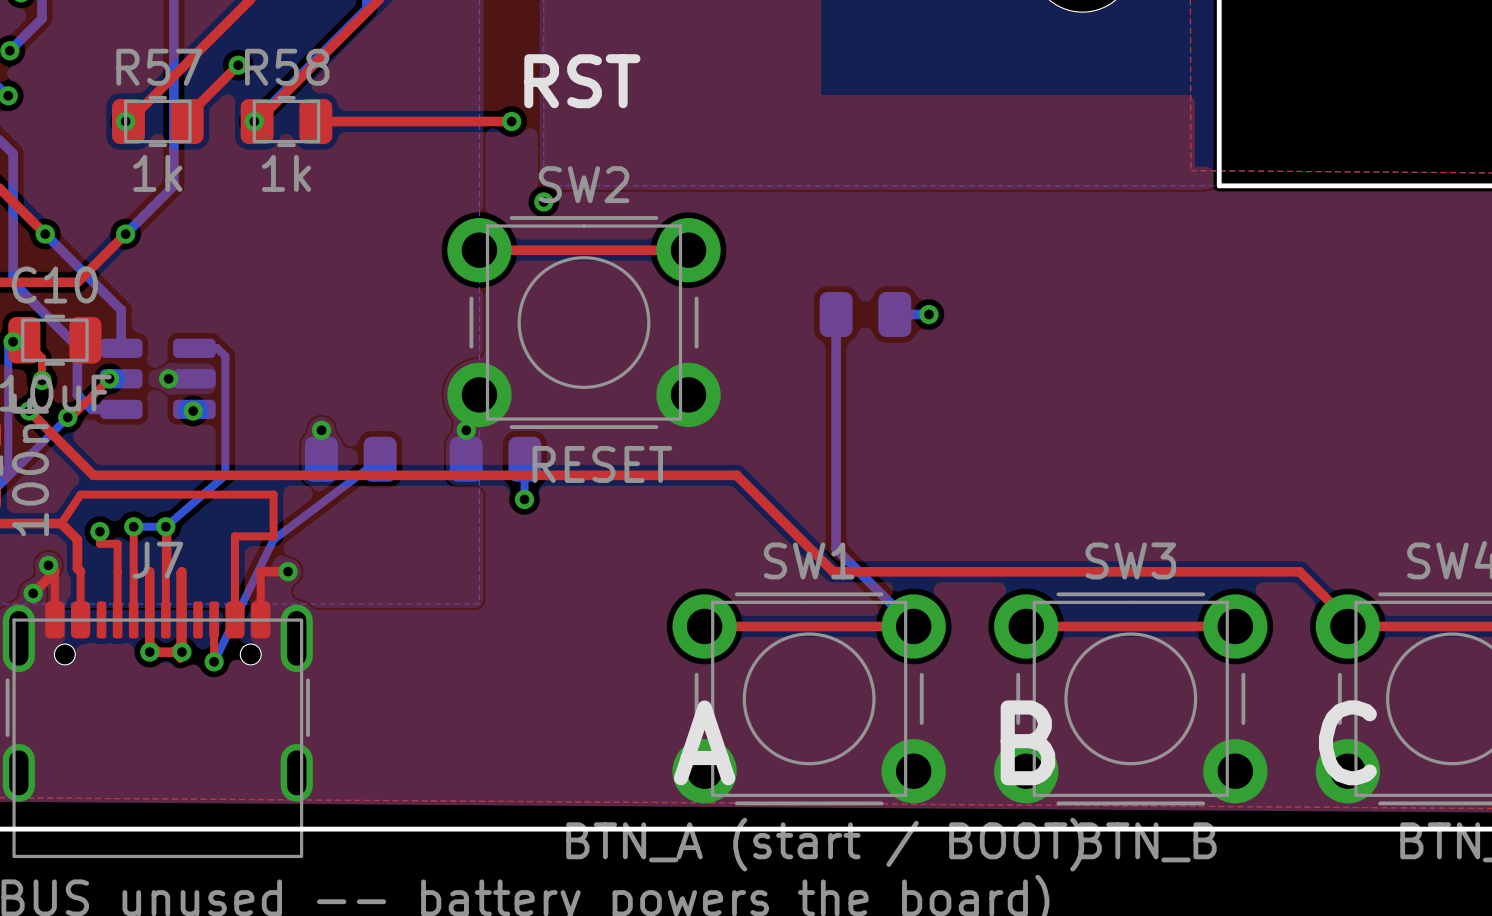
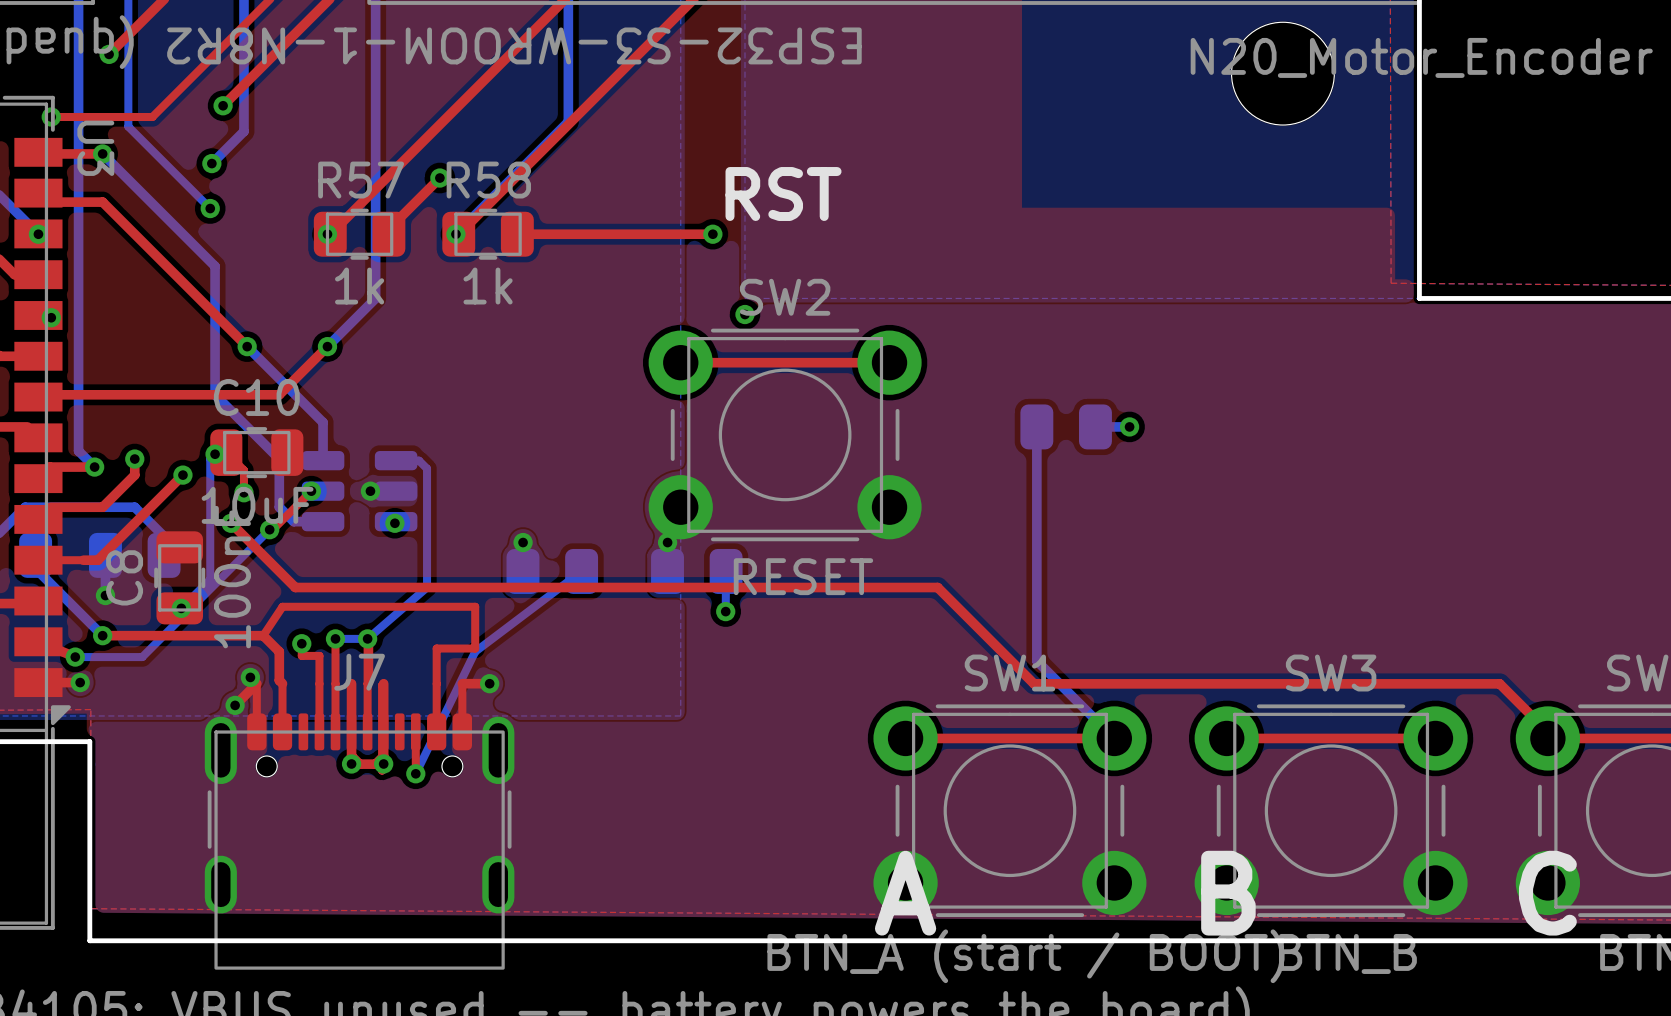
text position: A (704, 742) -> A (905, 893)
text position: B (1027, 742) -> B (1228, 893)
text position: C (1347, 742) -> C (1547, 893)

